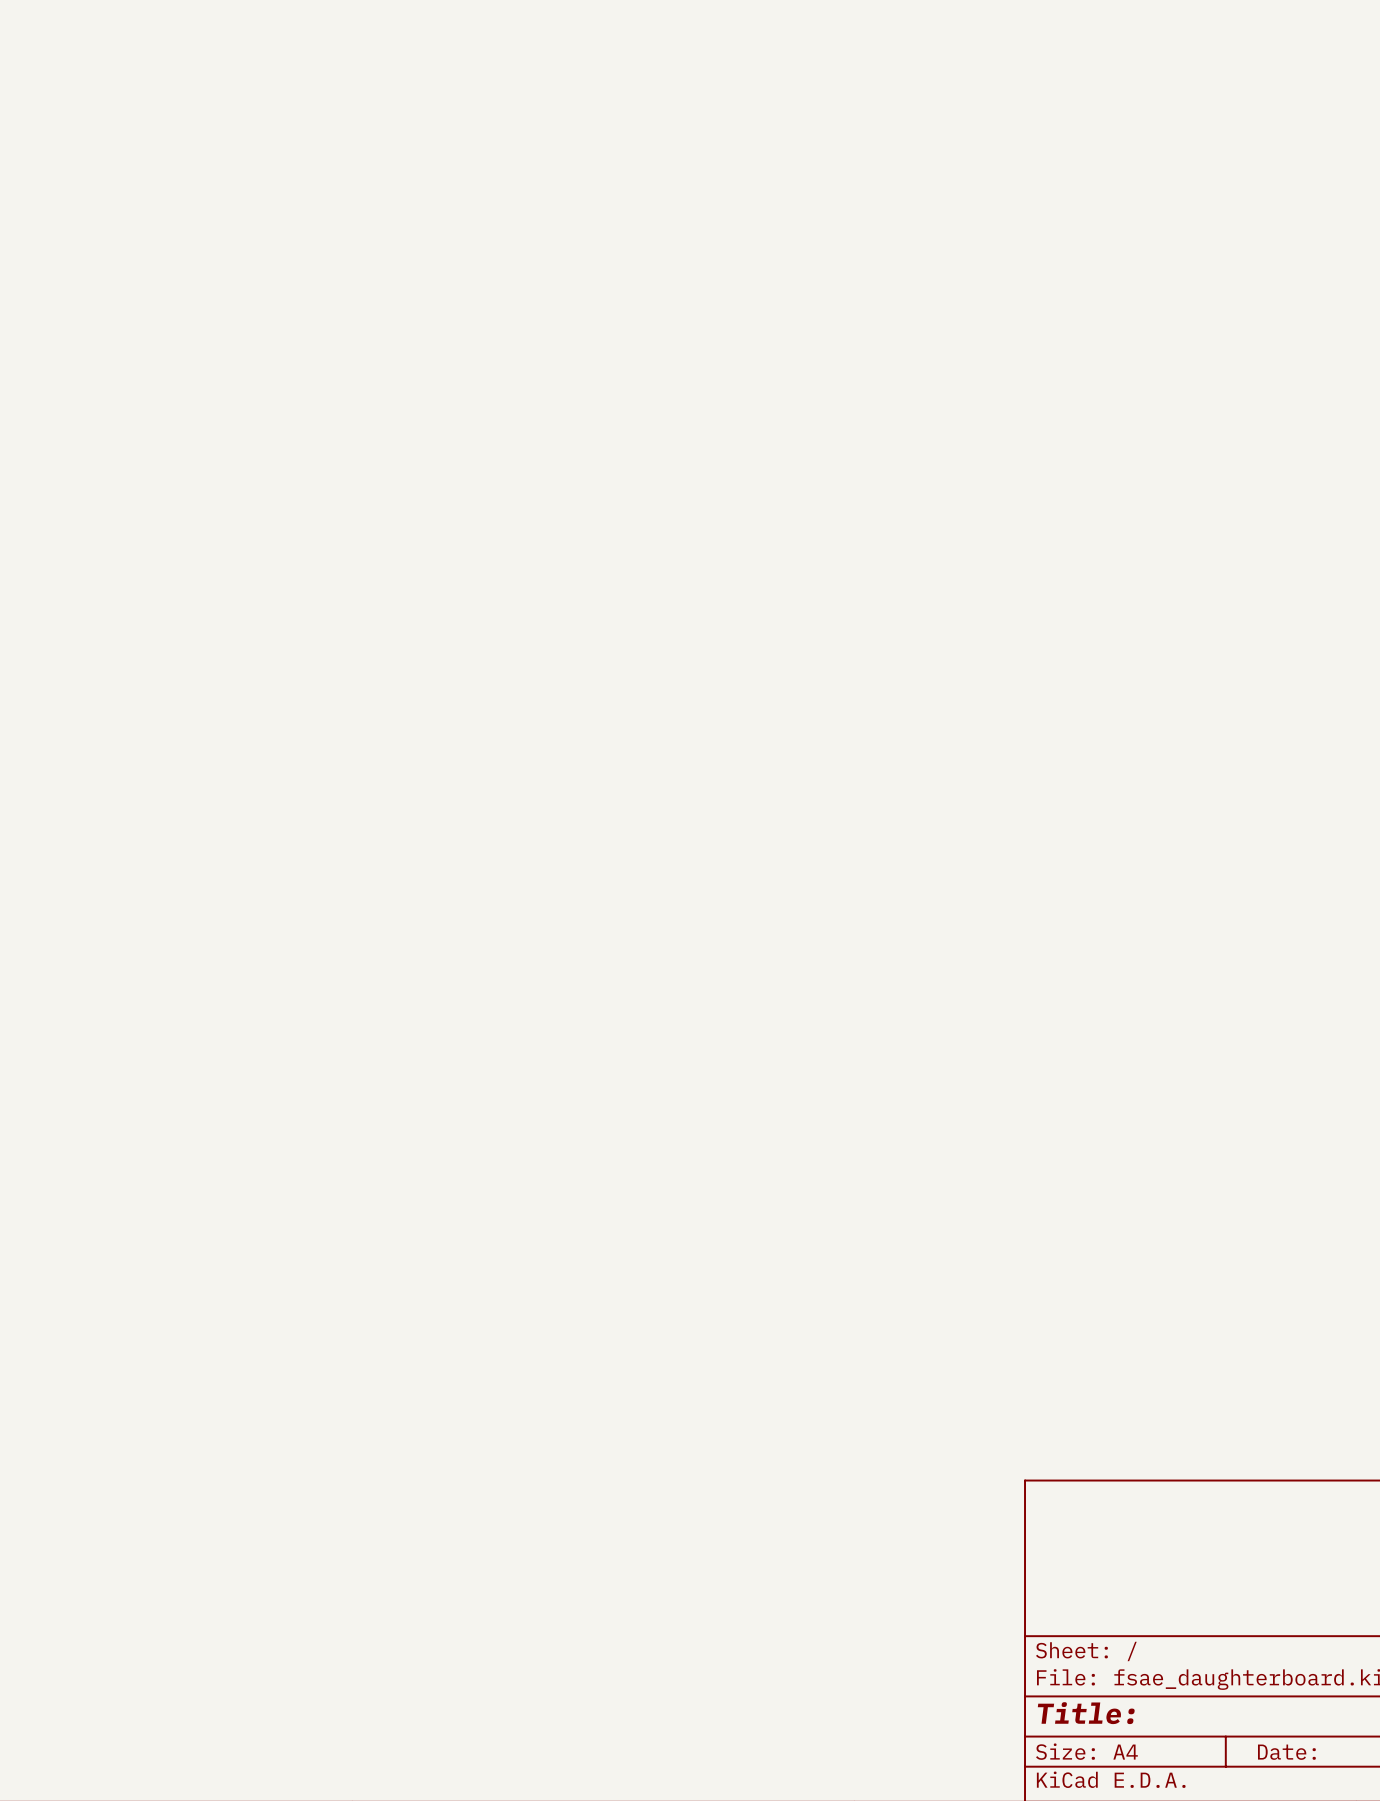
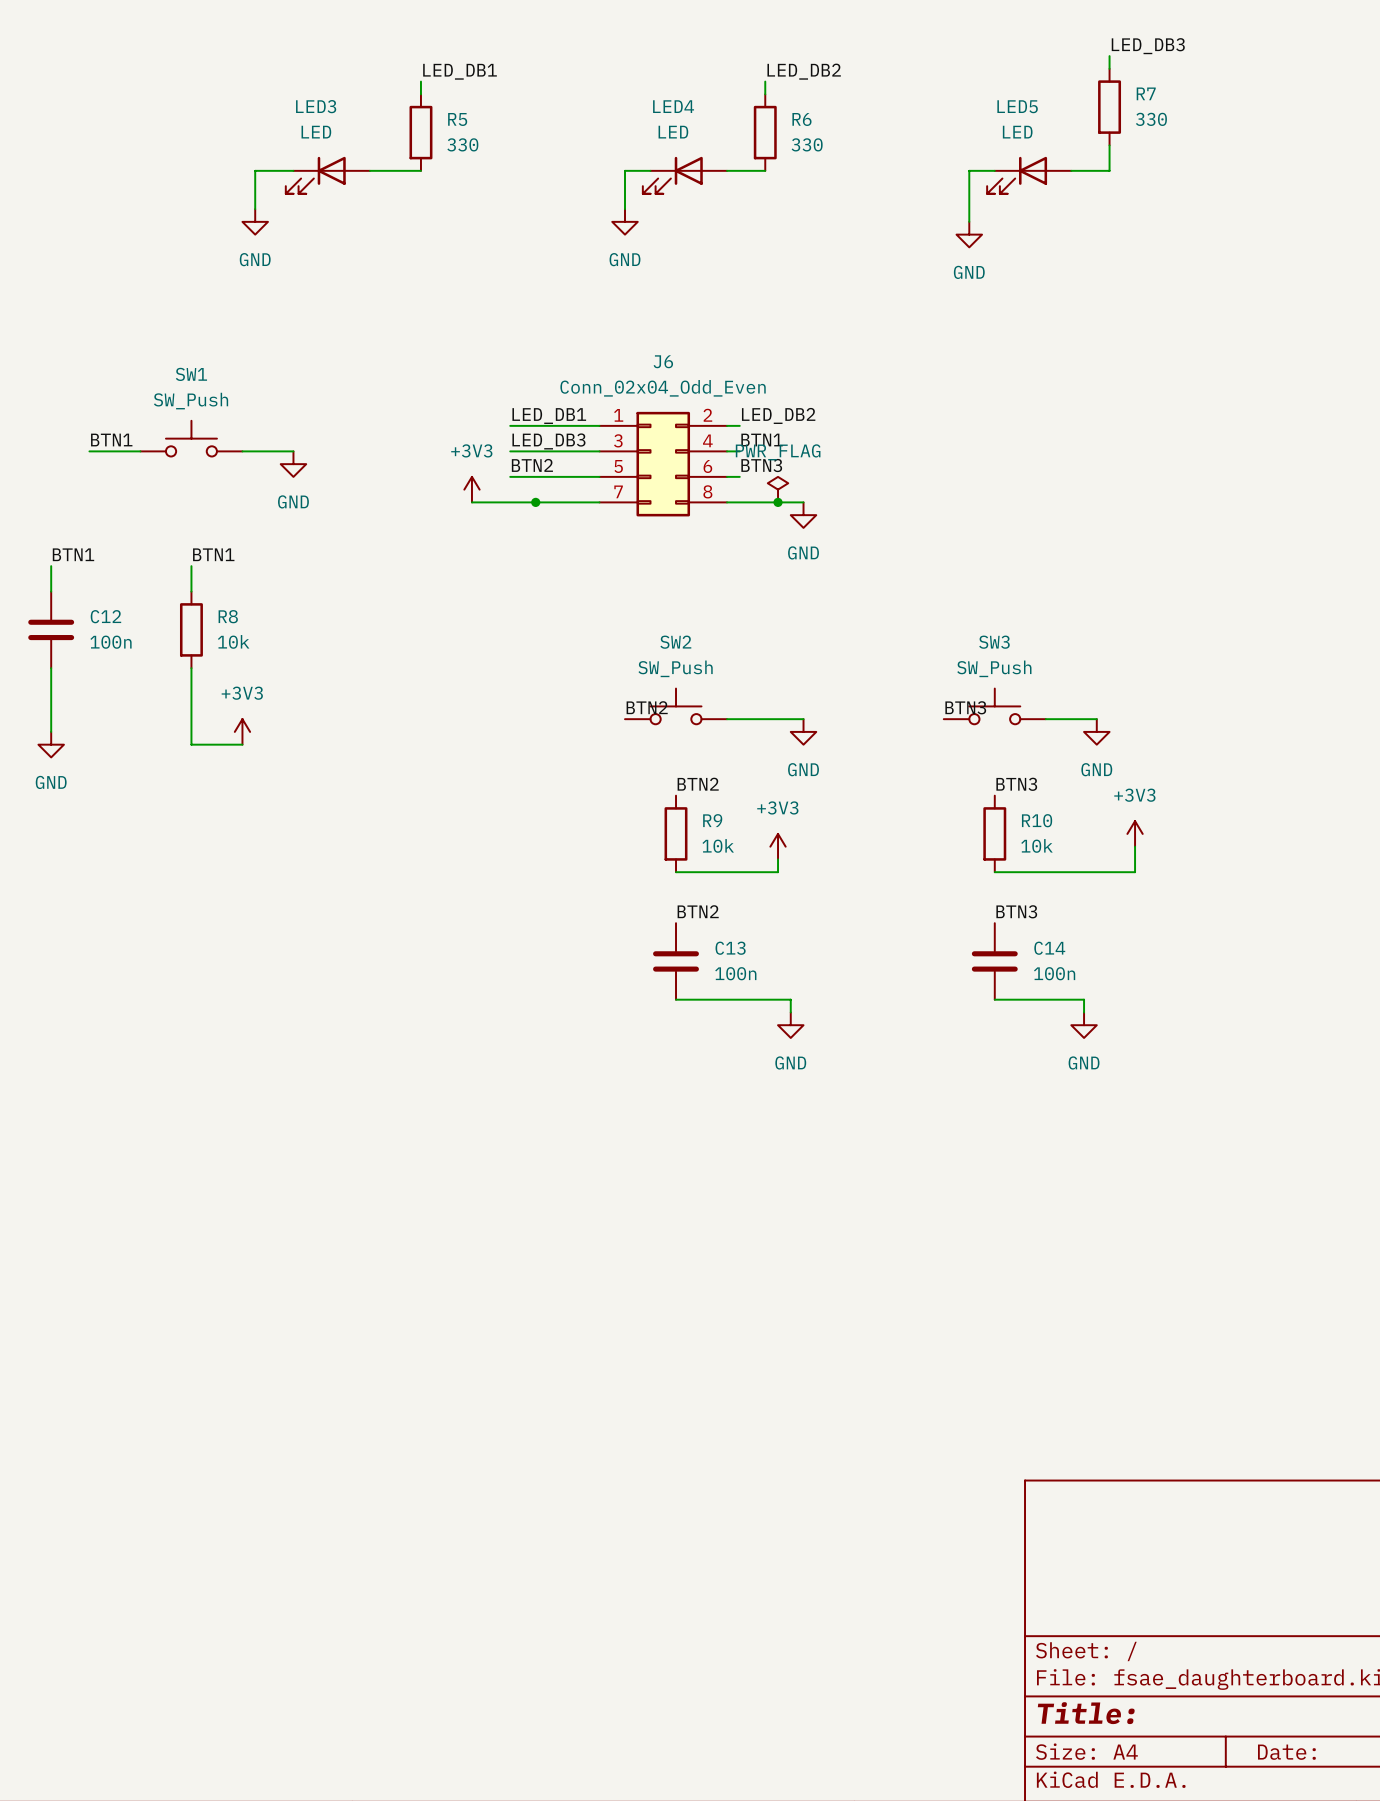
label: none -> LED_DB3 (1148, 46)
wire: none -> (1109, 56) (1109, 68)
label: none -> LED_DB1 (460, 71)
label: none -> LED_DB2 (804, 71)
wire: none -> (420, 81) (420, 94)
wire: none -> (765, 81) (765, 94)
R7: none -> 330 (1109, 107)
R5: none -> 330 (420, 132)
R6: none -> 330 (765, 132)
wire: none -> (1109, 145) (1109, 170) (1071, 170)
wire: none -> (293, 170) (255, 170) (255, 209)
wire: none -> (369, 170) (420, 170)
wire: none -> (650, 170) (625, 170) (625, 209)
wire: none -> (727, 170) (765, 170)
wire: none -> (994, 170) (969, 170) (969, 221)
LED3: none -> LED (327, 175)
LED4: none -> LED (684, 175)
LED5: none -> LED (1029, 175)
power symbol: none -> GND (255, 221)
power symbol: none -> GND (625, 221)
power symbol: none -> GND (969, 234)
label: none -> LED_DB2 (778, 415)
label: none -> LED_DB1 (549, 416)
wire: none -> (510, 425) (599, 425)
wire: none -> (727, 425) (739, 425)
SW1: none -> SW_Push (191, 438)
label: none -> BTN1 (111, 440)
label: none -> BTN1 (762, 440)
label: none -> LED_DB3 (548, 441)
wire: none -> (89, 451) (140, 451)
wire: none -> (242, 451) (293, 451)
wire: none -> (510, 451) (599, 451)
wire: none -> (727, 451) (739, 451)
power symbol: none -> GND (293, 464)
J6: none -> Conn_02x04_Odd_Even (663, 464)
label: none -> BTN2 (532, 465)
label: none -> BTN3 (761, 465)
wire: none -> (510, 476) (599, 476)
wire: none -> (727, 476) (739, 476)
power symbol: none -> +3V3 (471, 489)
power symbol: none -> PWR_FLAG (778, 489)
wire: none -> (471, 502) (599, 502)
junction: none -> (535, 502)
wire: none -> (727, 502) (803, 502)
junction: none -> (778, 502)
power symbol: none -> GND (803, 515)
label: none -> BTN1 (73, 554)
label: none -> BTN1 (213, 554)
wire: none -> (51, 566) (51, 591)
wire: none -> (191, 566) (191, 591)
C12: none -> 100n (51, 629)
R8: none -> 10k (191, 629)
wire: none -> (51, 668) (51, 731)
wire: none -> (191, 668) (191, 744) (242, 744)
SW2: none -> SW_Push (676, 706)
SW3: none -> SW_Push (994, 706)
label: none -> BTN2 (647, 707)
label: none -> BTN3 (965, 707)
wire: none -> (727, 719) (803, 719)
wire: none -> (1045, 719) (1096, 719)
power symbol: none -> +3V3 (242, 731)
power symbol: none -> GND (803, 731)
power symbol: none -> GND (1096, 731)
power symbol: none -> GND (51, 744)
label: none -> BTN2 (698, 784)
label: none -> BTN3 (1016, 784)
R9: none -> 10k (676, 833)
R10: none -> 10k (994, 833)
power symbol: none -> +3V3 (1135, 833)
power symbol: none -> +3V3 (778, 846)
wire: none -> (1135, 846) (1135, 872) (994, 872)
wire: none -> (778, 859) (778, 872) (676, 872)
label: none -> BTN2 (698, 911)
label: none -> BTN3 (1016, 911)
C13: none -> 100n (676, 961)
C14: none -> 100n (994, 961)
wire: none -> (676, 999) (790, 999) (790, 1012)
wire: none -> (994, 999) (1084, 999) (1084, 1012)
power symbol: none -> GND (790, 1025)
power symbol: none -> GND (1084, 1025)

